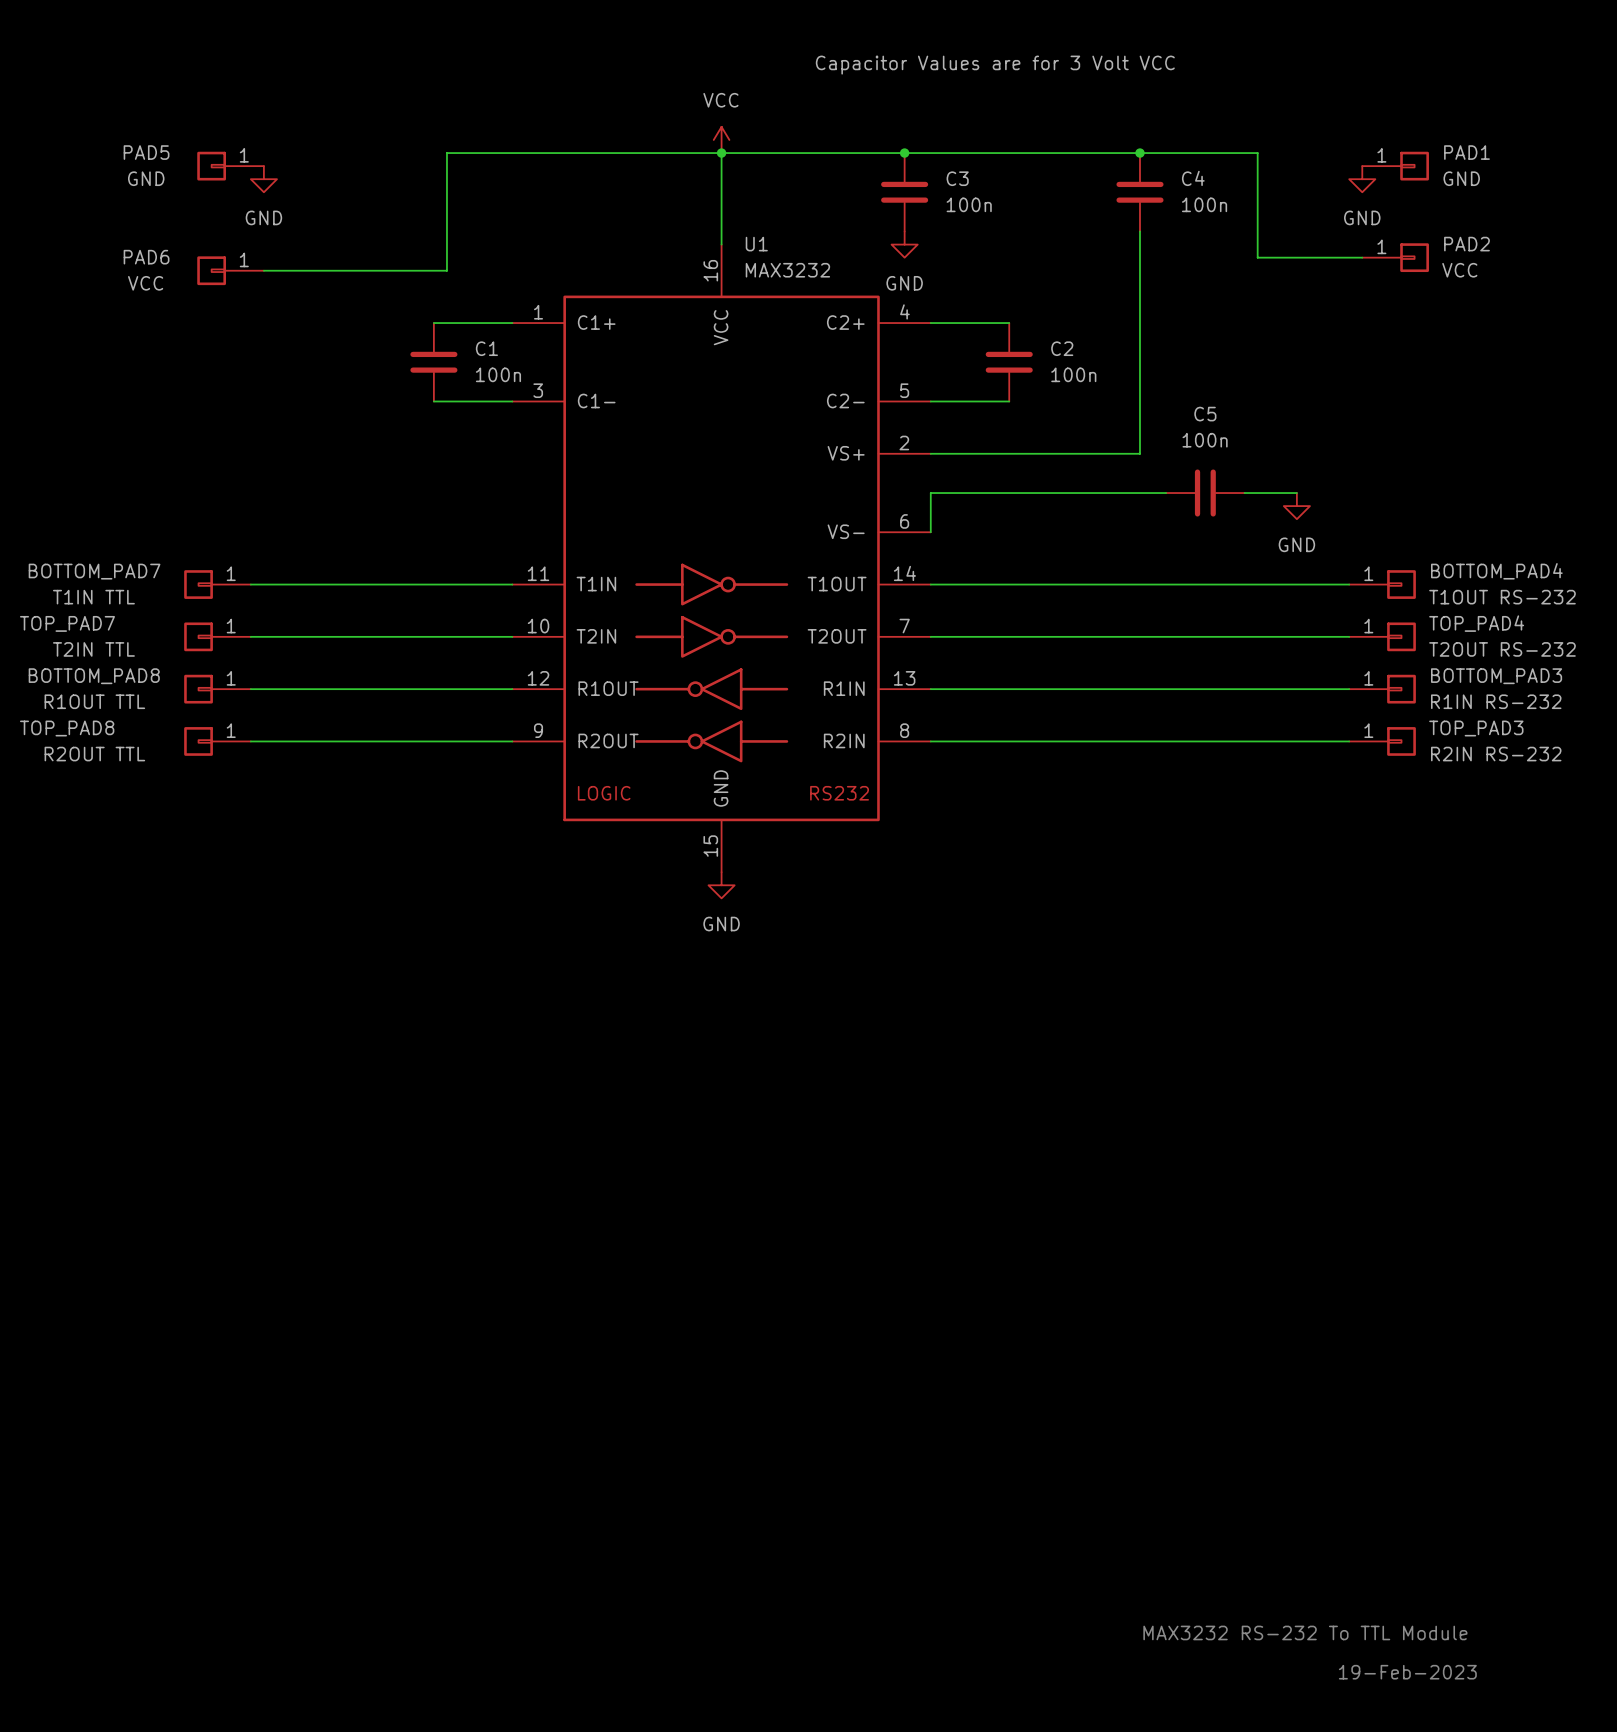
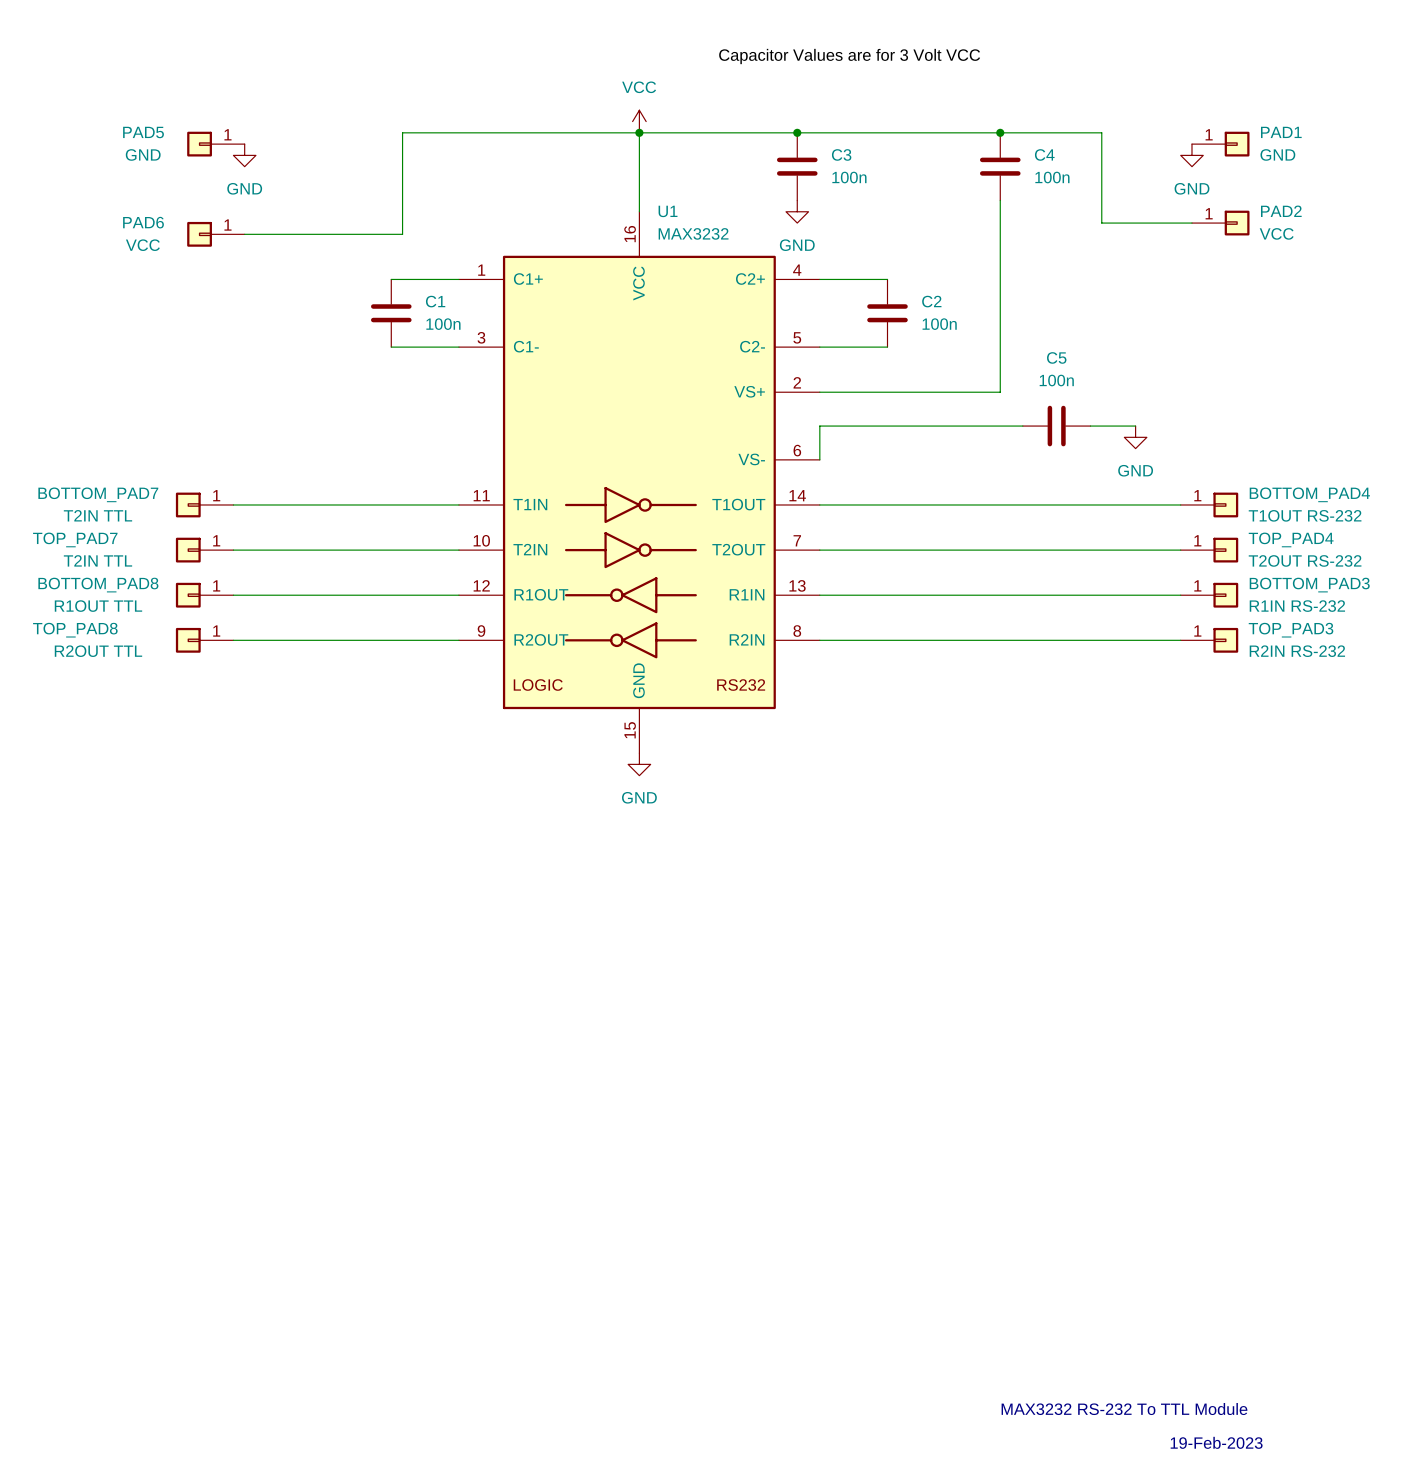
BOTTOM_PAD7 value: T1IN TTL (93, 597) -> T2IN TTL (97, 515)

